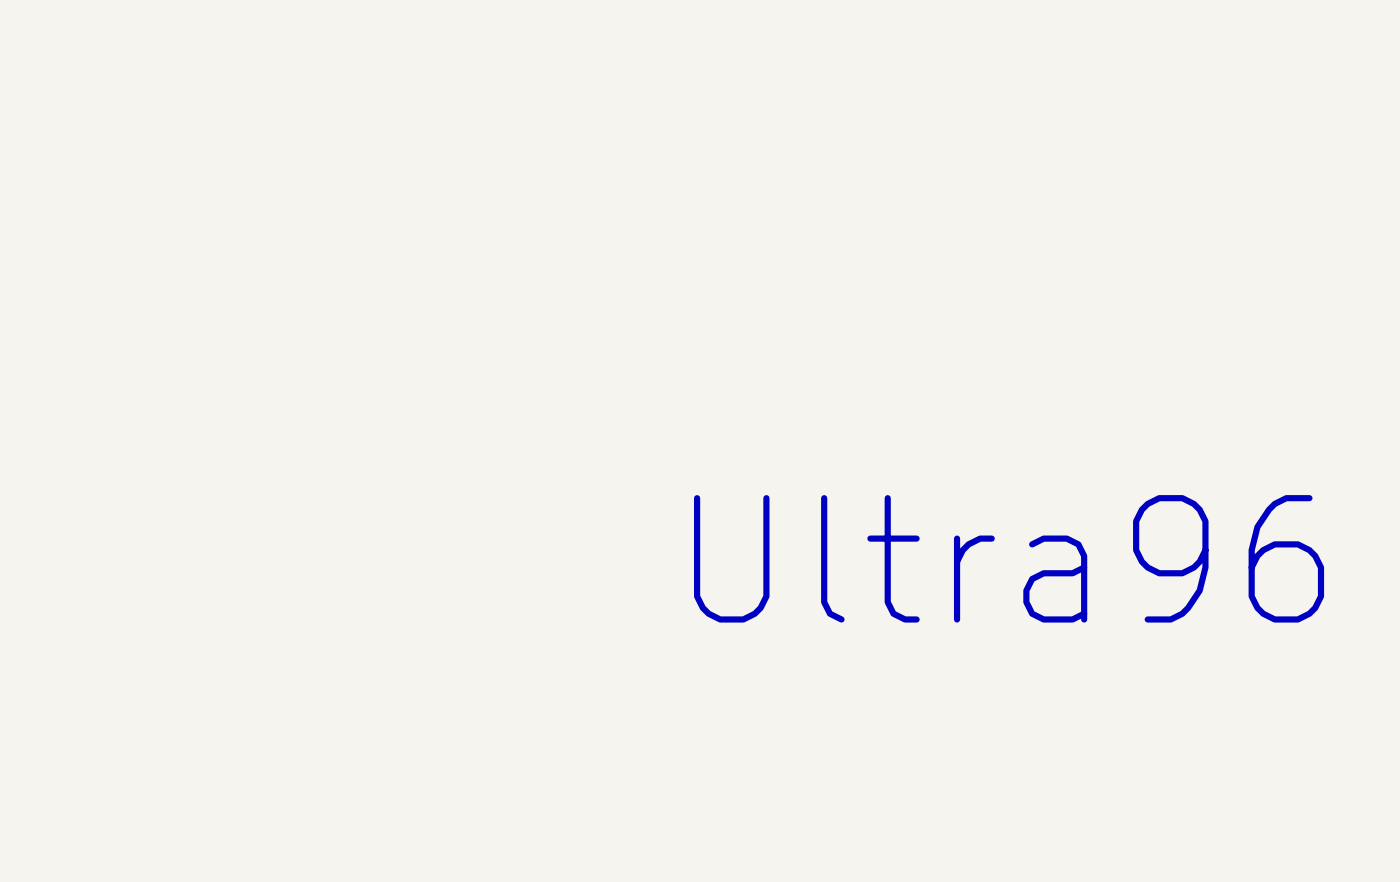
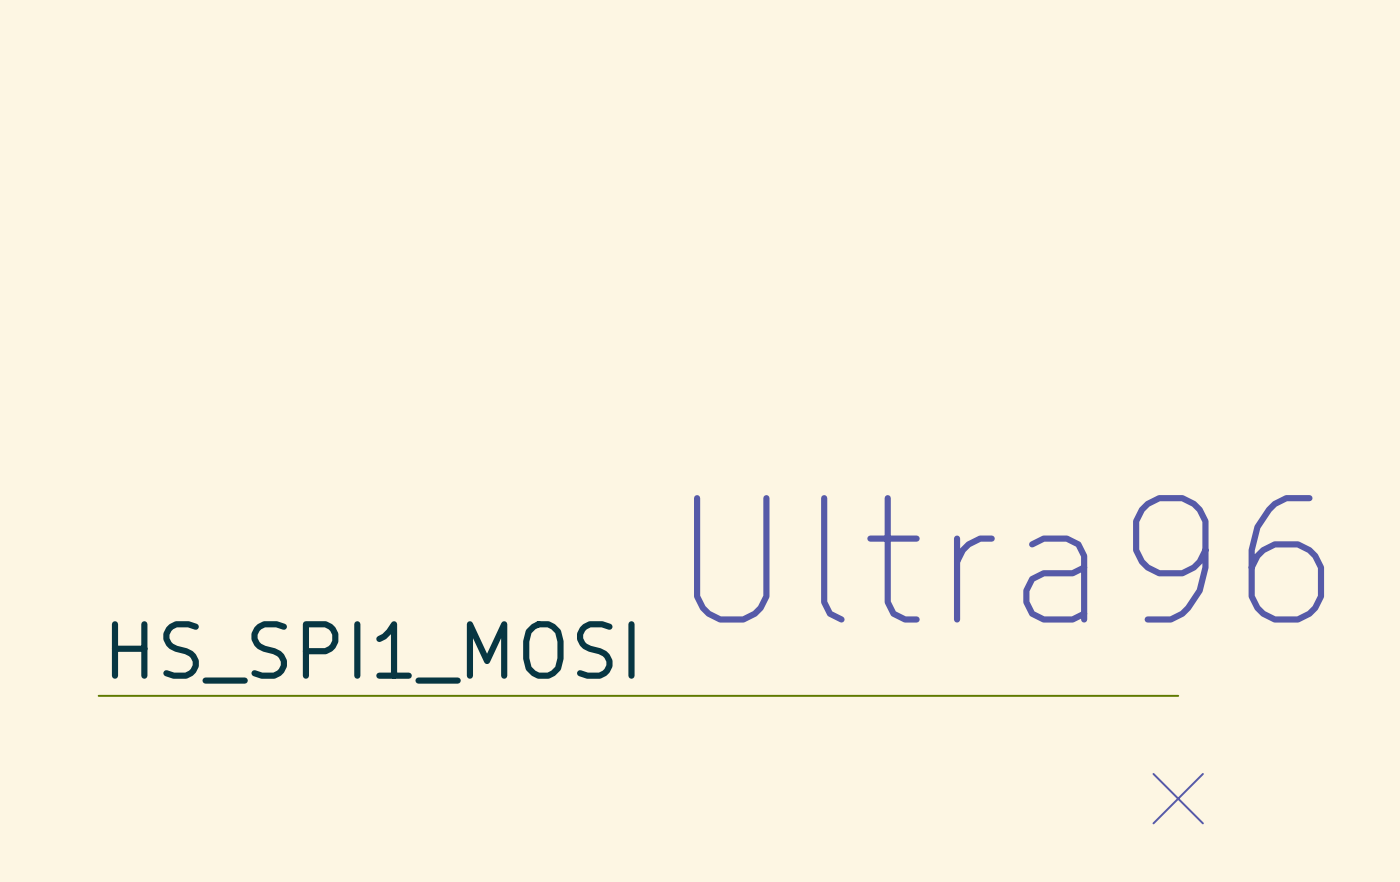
label: none -> HS_SPI1_MOSI (373, 652)
wire: none -> (98, 695) (1178, 695)
no-connect mark: none -> (1178, 798)

